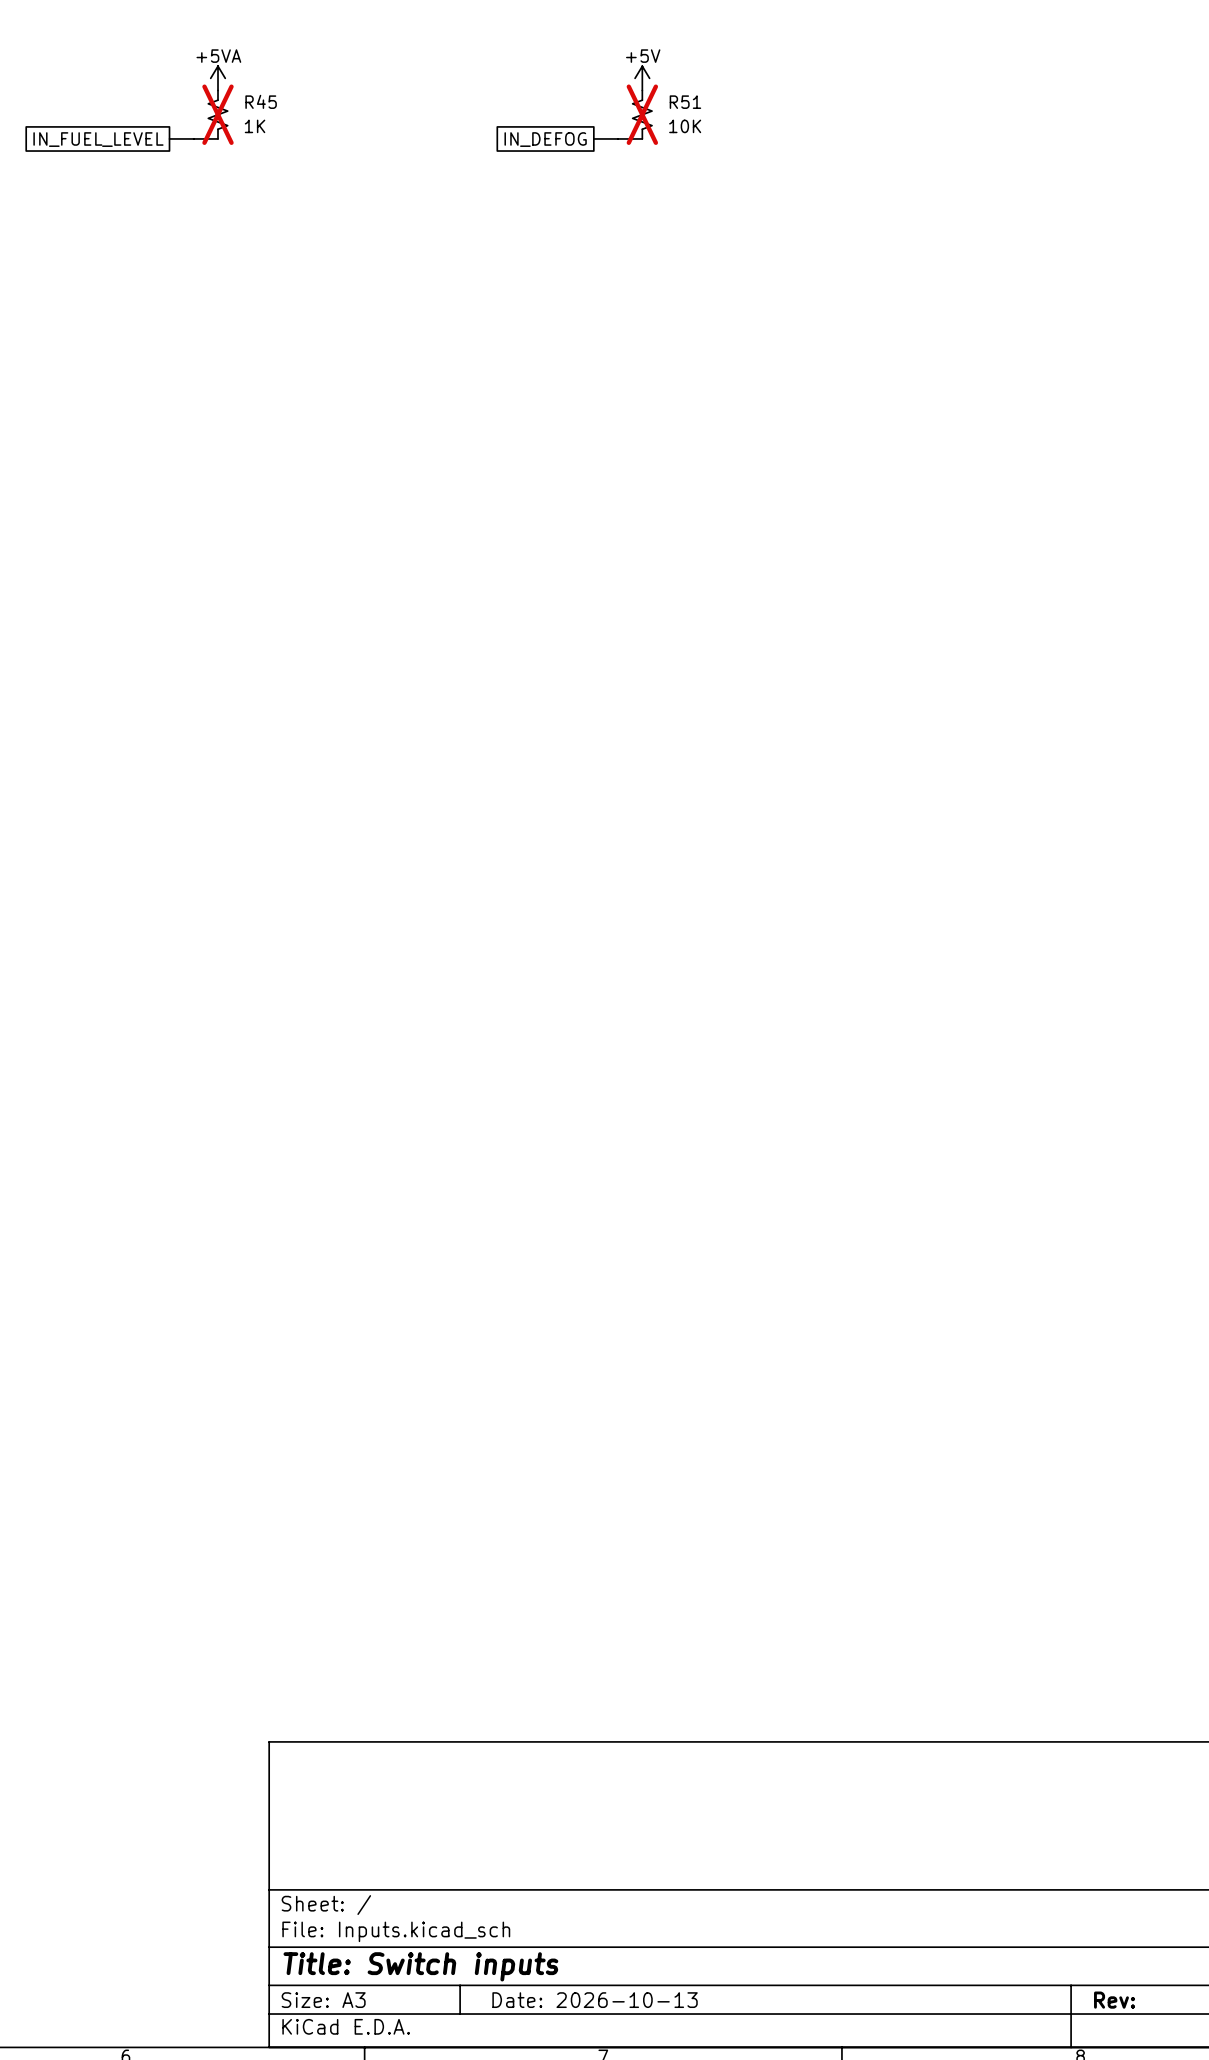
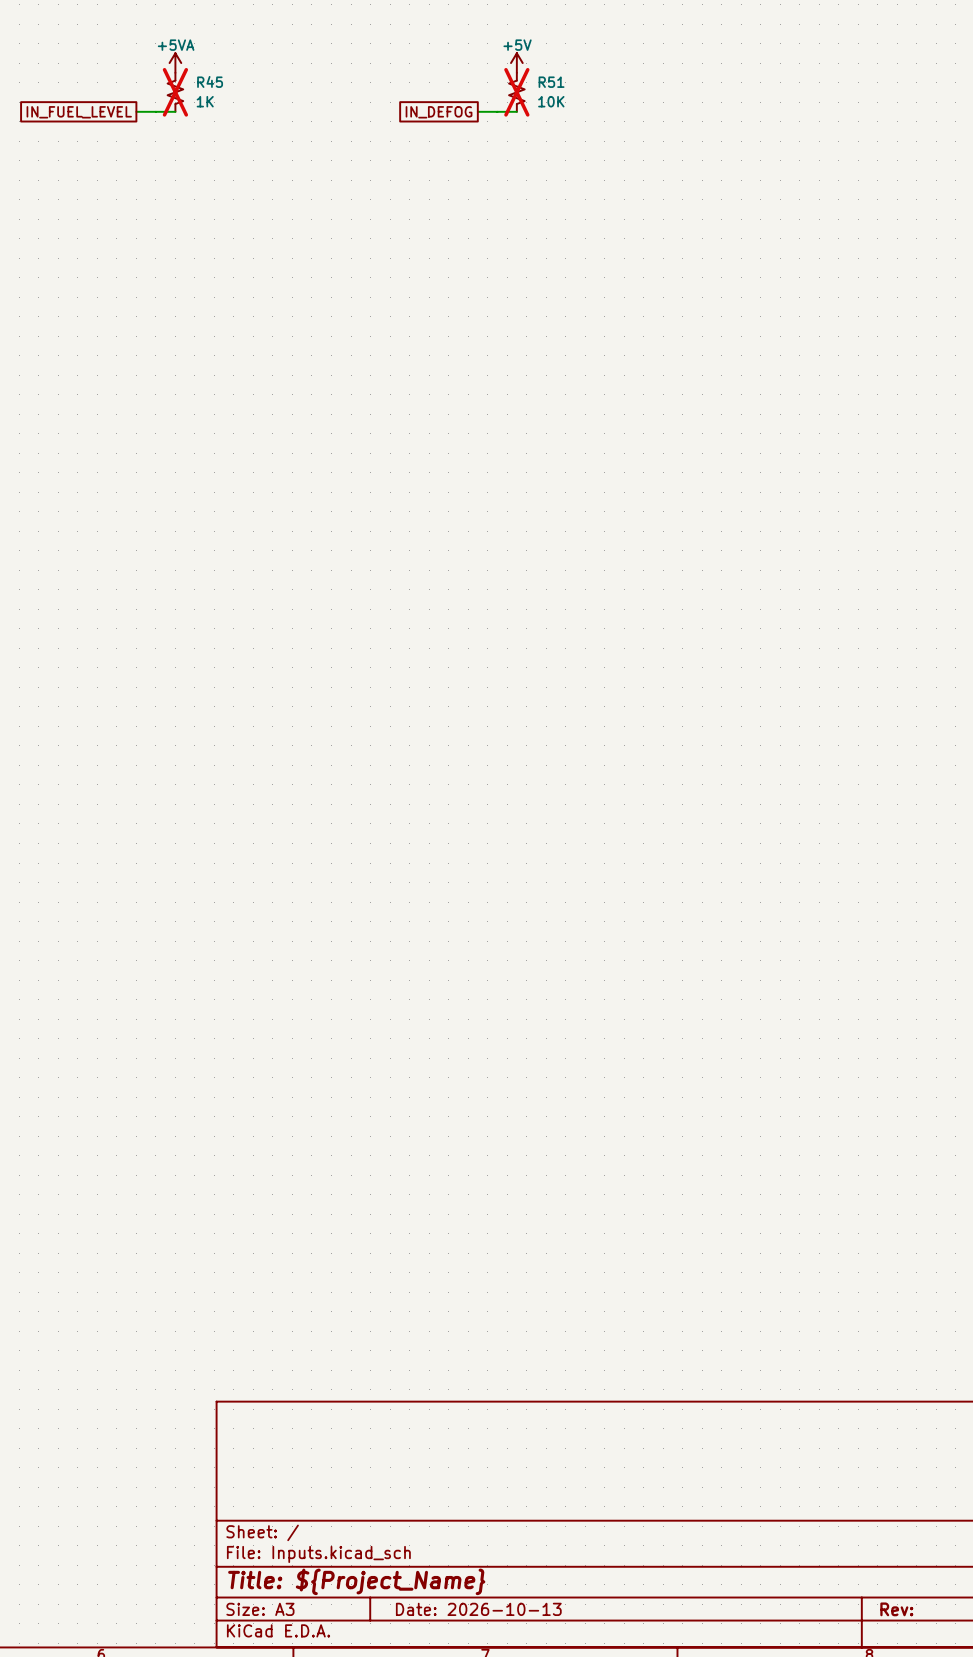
title block: Title: Switch inputs (420, 1966) -> Title: ${Project_Name} (356, 1581)

